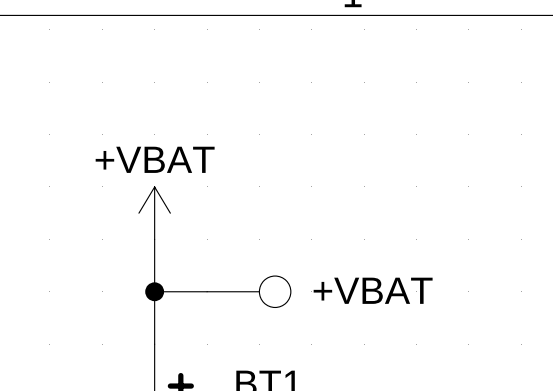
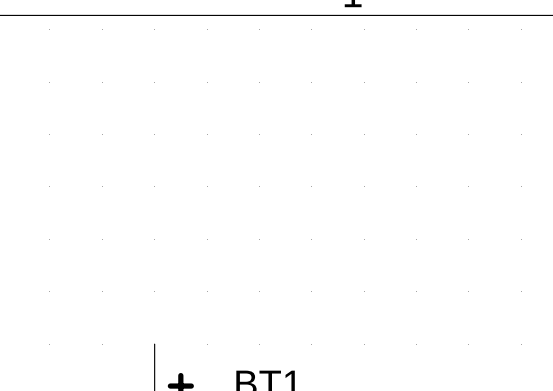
power symbol: +VBAT (154, 213) -> none
wire: (154, 239) (154, 344) -> none
wire: (154, 291) (207, 291) -> none
junction: (154, 291) -> none
part: +VBAT (248, 291) -> none

